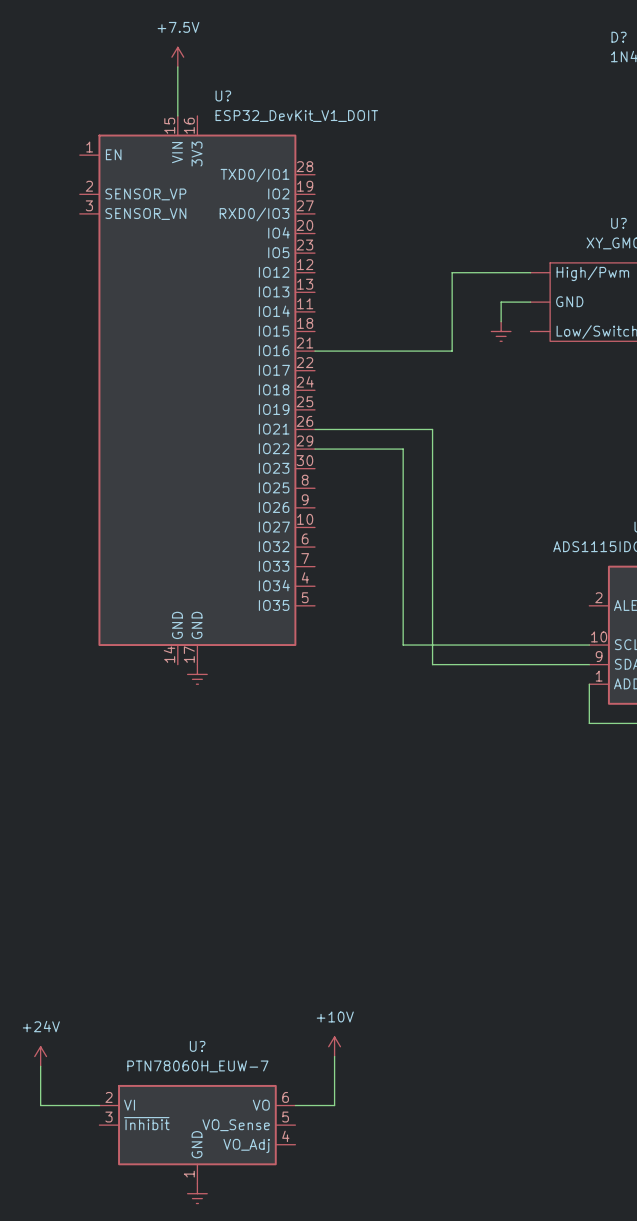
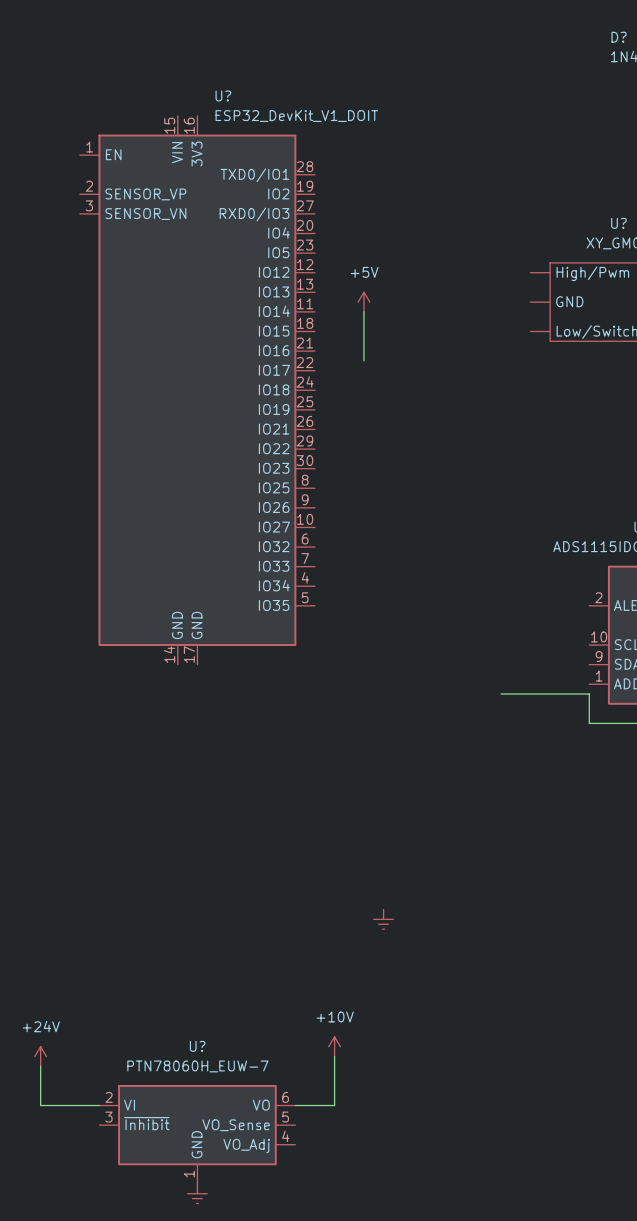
power symbol: +7.5V (177, 57) -> none
wire: (177, 66) (177, 115) -> none
wire: (530, 272) (452, 272) (452, 351) (314, 351) -> none
power symbol: none -> +5V (363, 302)
wire: (530, 302) (501, 302) (501, 321) -> none
wire: none -> (363, 311) (363, 360)
power symbol: (501, 331) -> none
wire: (314, 429) (432, 429) (432, 664) (589, 664) -> none
wire: (314, 449) (403, 449) (403, 645) (589, 645) -> none
power symbol: (197, 674) -> none
wire: (589, 684) (589, 694) -> (501, 694) (589, 694)
power symbol: none -> (383, 919)

